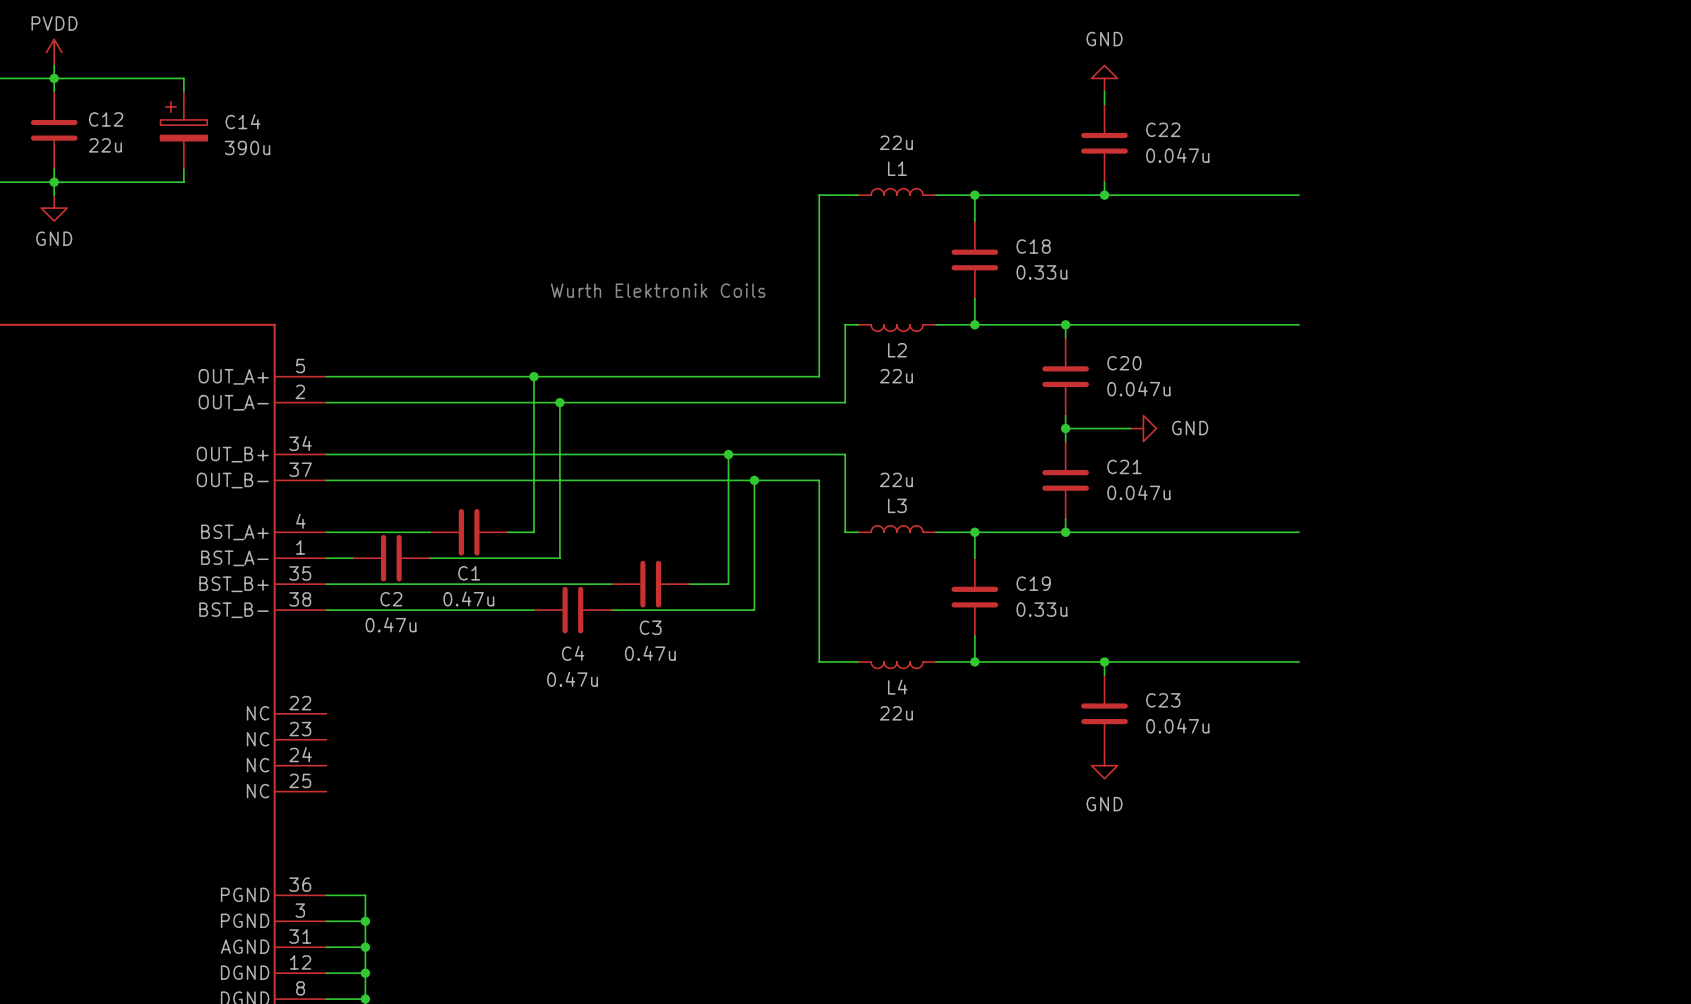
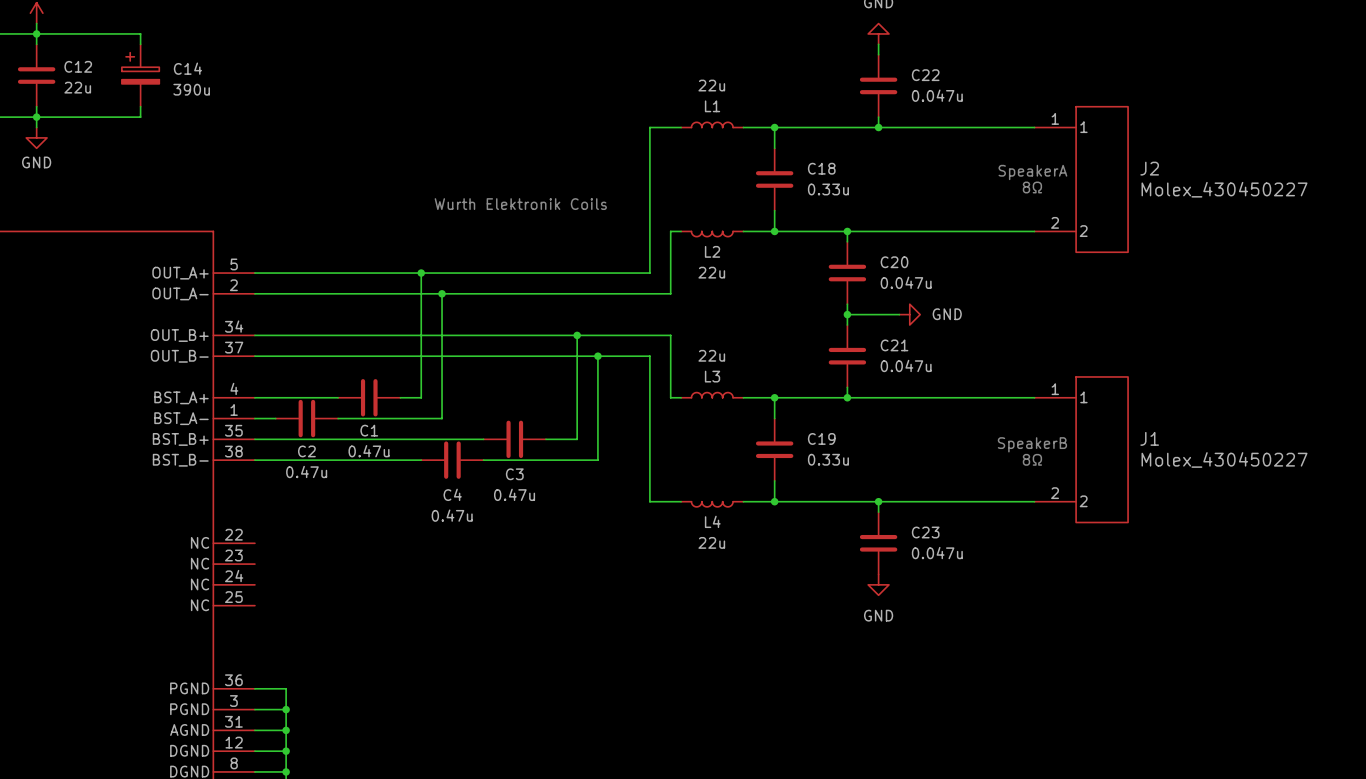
text: none -> SpeakerA (1032, 172)
J2: none -> Molex_430450227 (1081, 179)
text: none -> 8Ω (1032, 187)
text: none -> SpeakerB (1032, 444)
J1: none -> Molex_430450227 (1081, 449)
text: none -> 8Ω (1032, 459)

